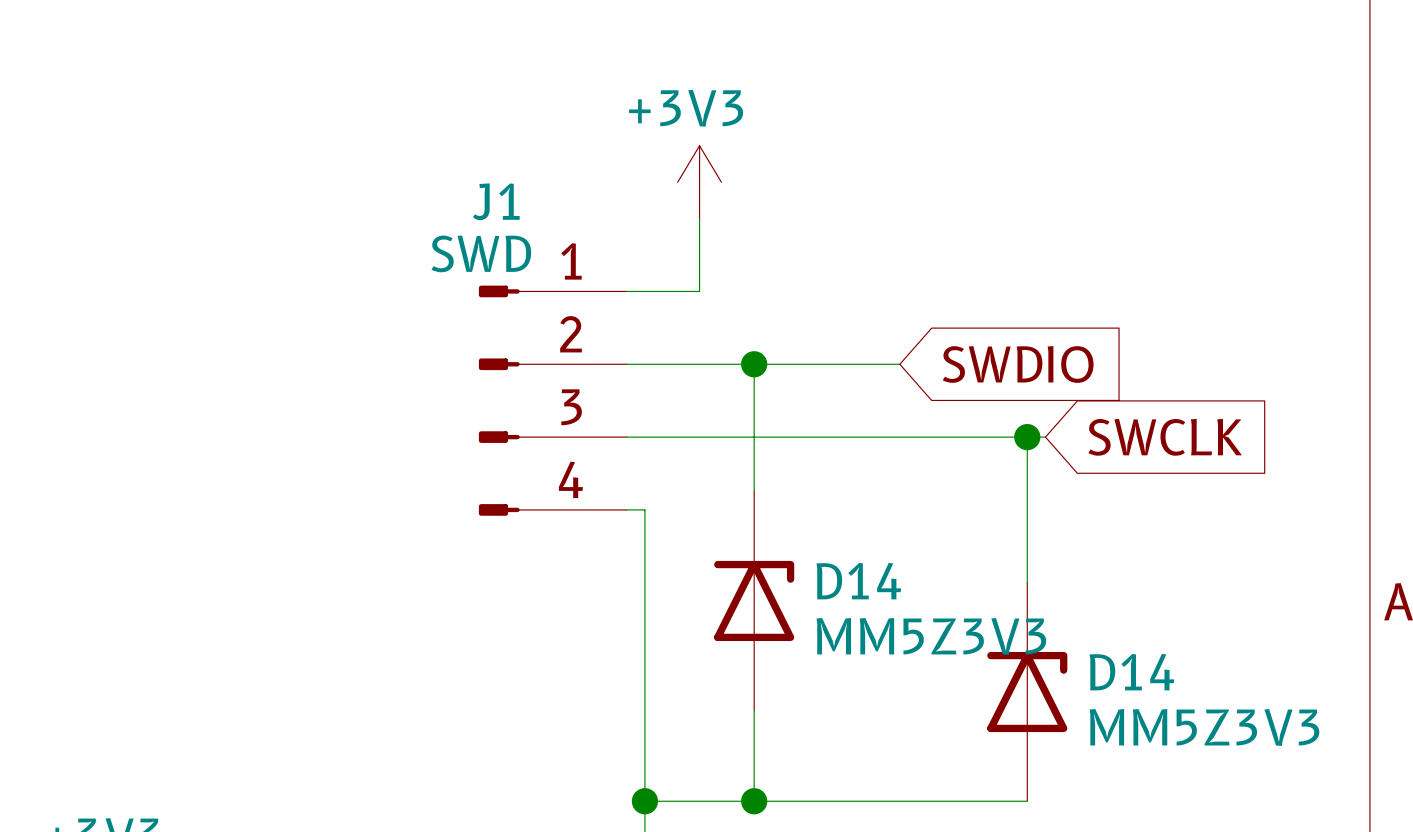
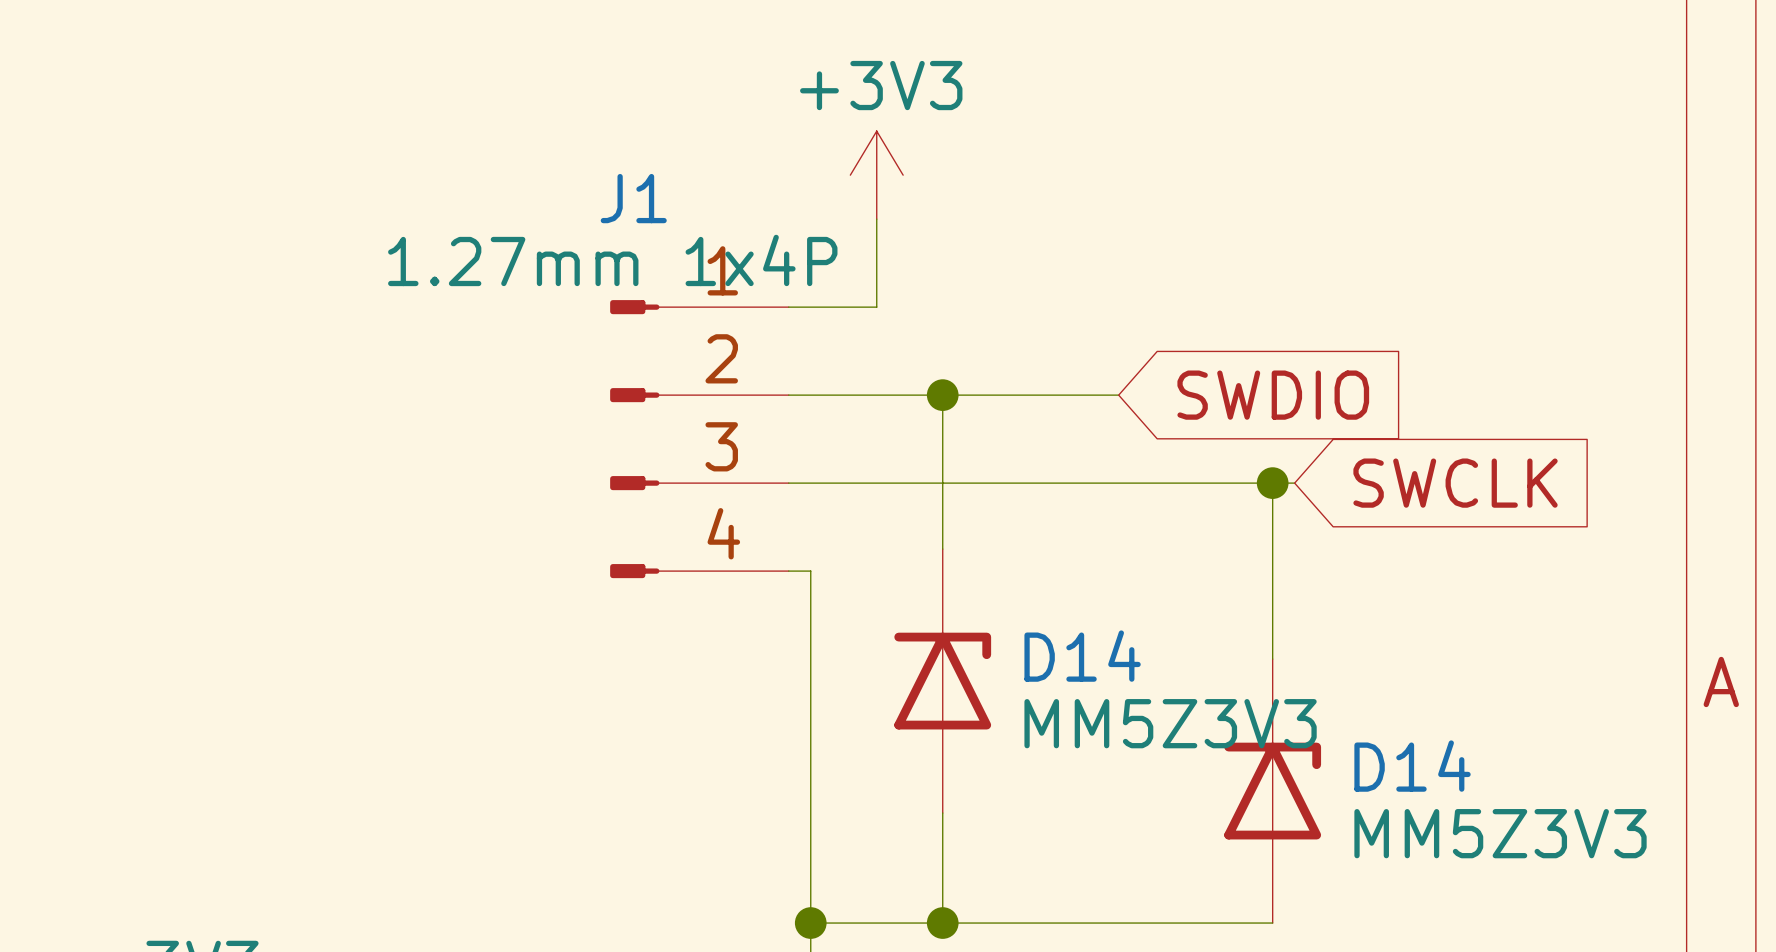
J1 value: SWD (481, 253) -> 1.27mm 1x4P (612, 260)

